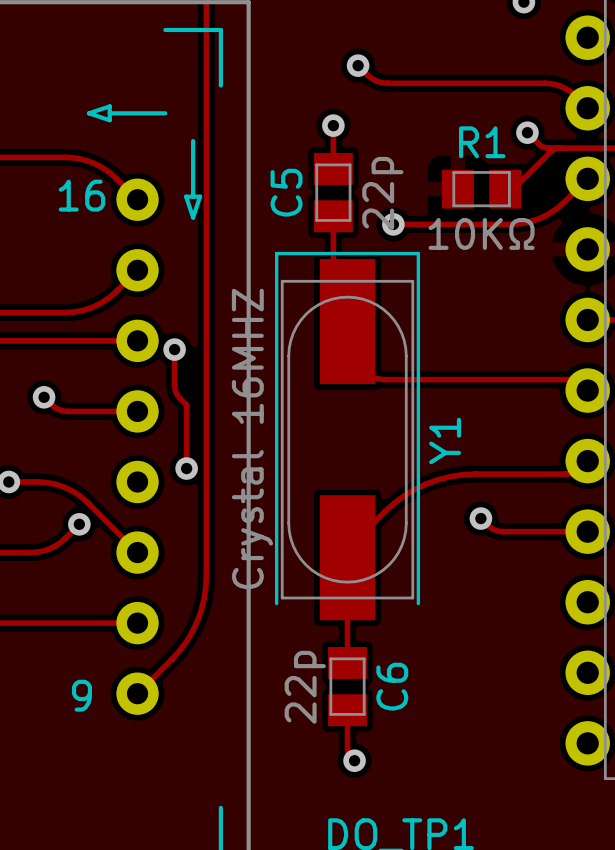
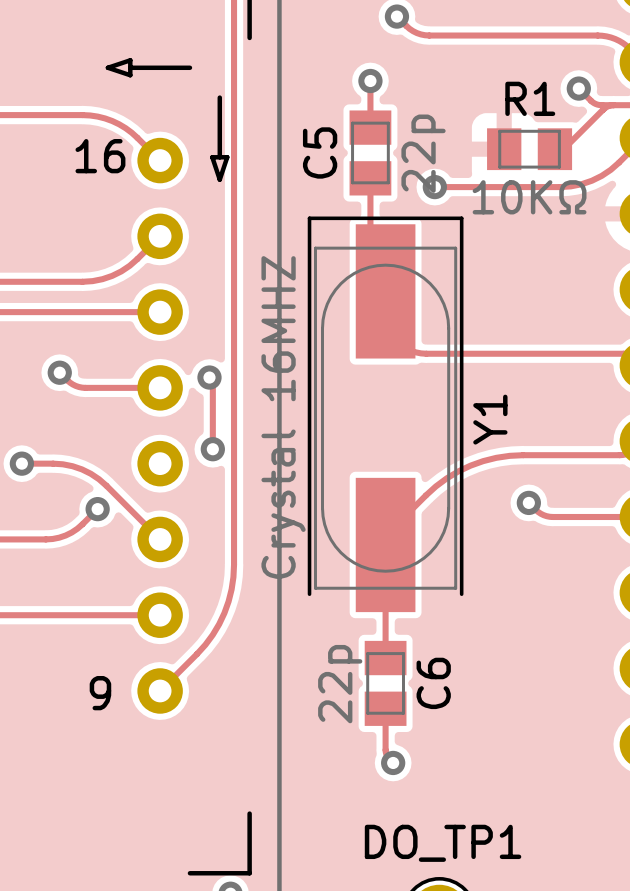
track: (174, 349) (174, 388) (183, 401) -> none
via position: (174, 349) -> (209, 377)

